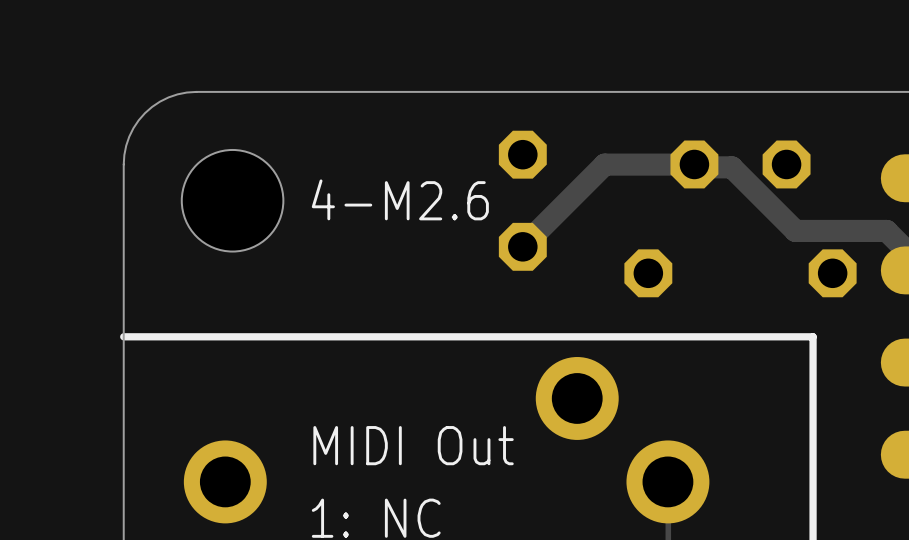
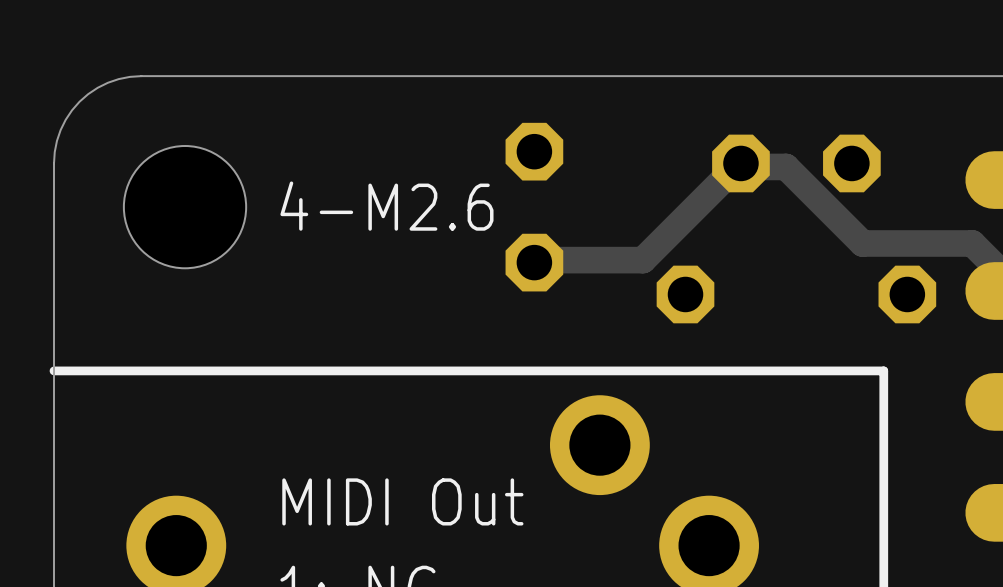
track: (693, 164) (604, 164) (524, 244) -> (739, 163) (642, 260) (536, 260)

